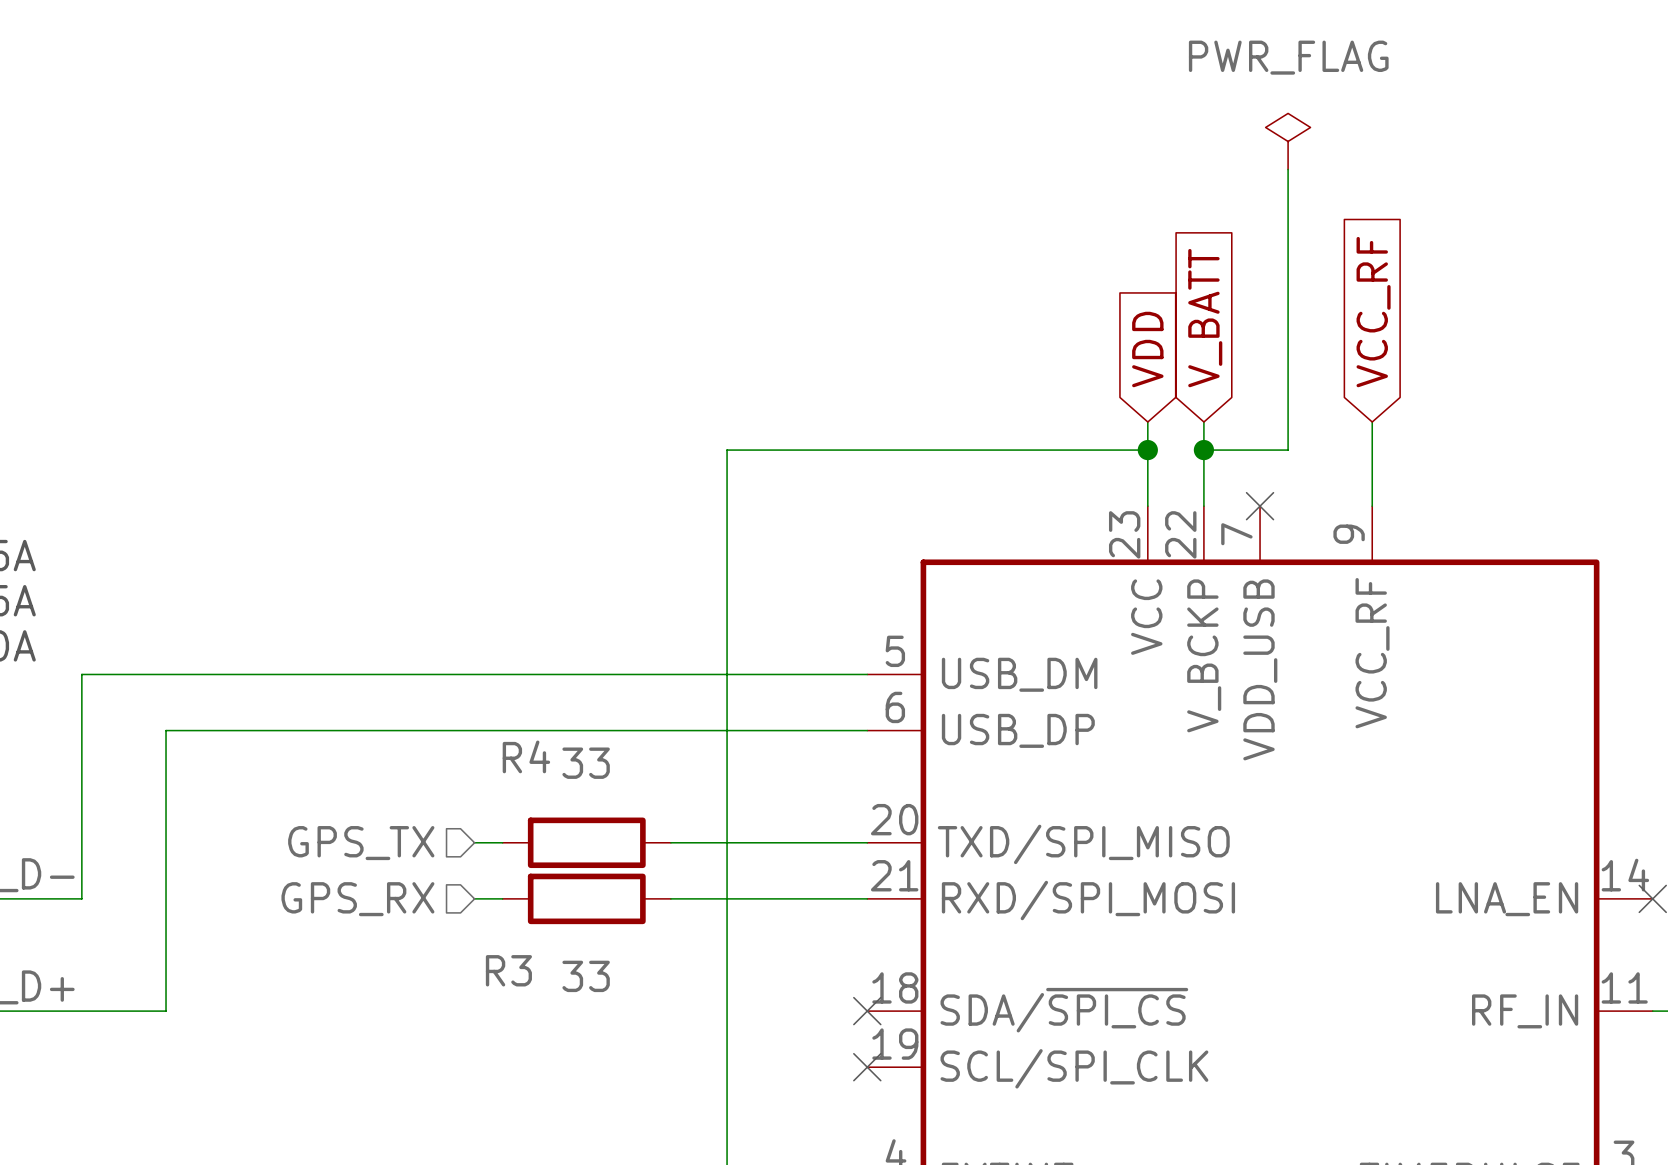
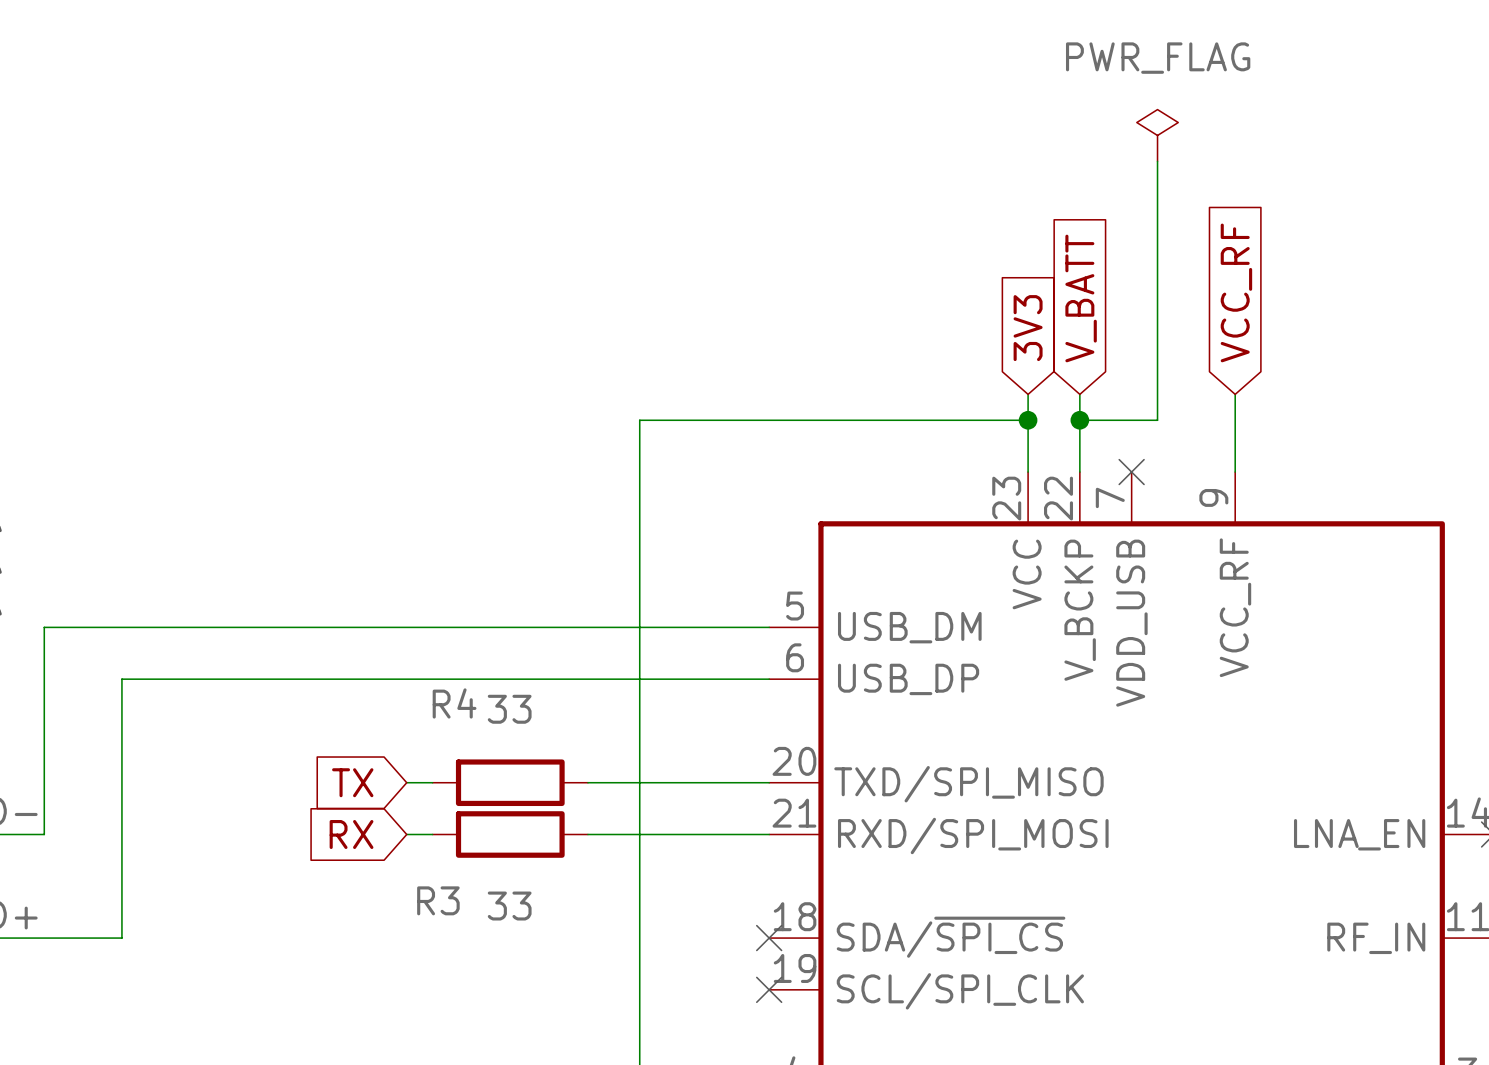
global label: VDD (1147, 349) -> 3V3 (1028, 328)
global label: none -> TX (352, 782)
hierarchical label: GPS_TX (361, 843) -> none
global label: none -> RX (351, 834)
hierarchical label: GPS_RX (357, 899) -> none

